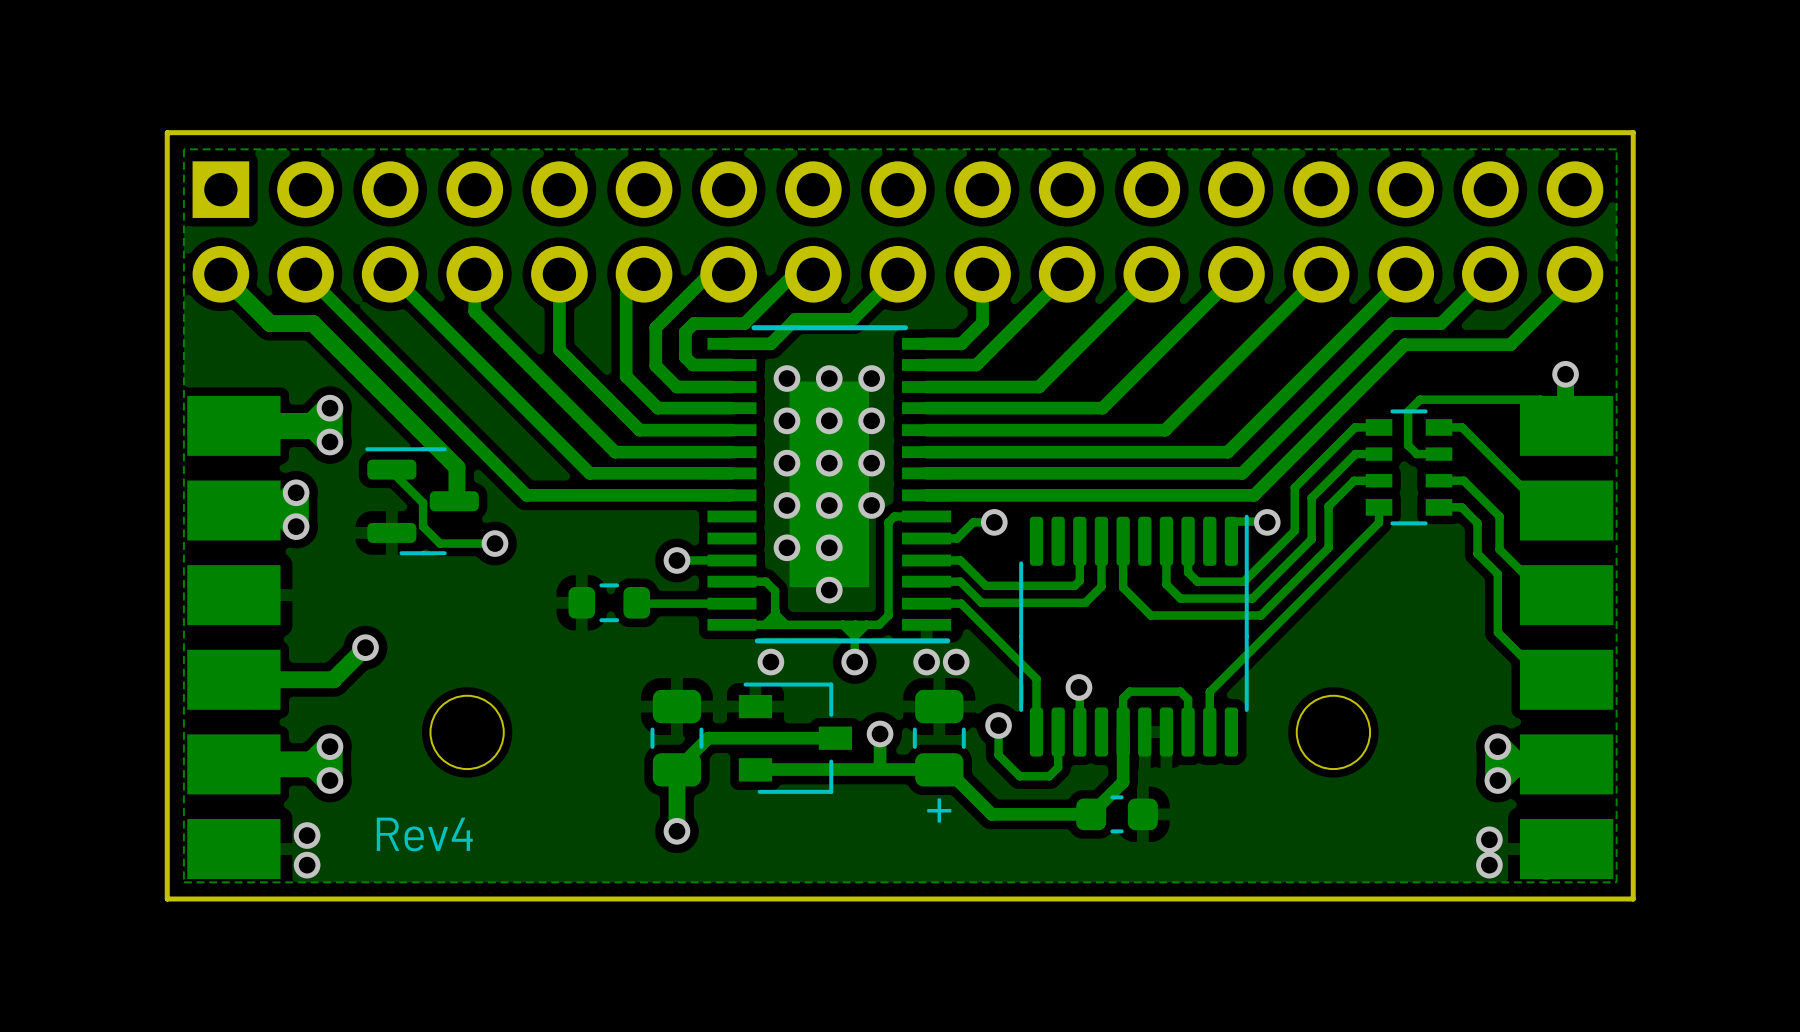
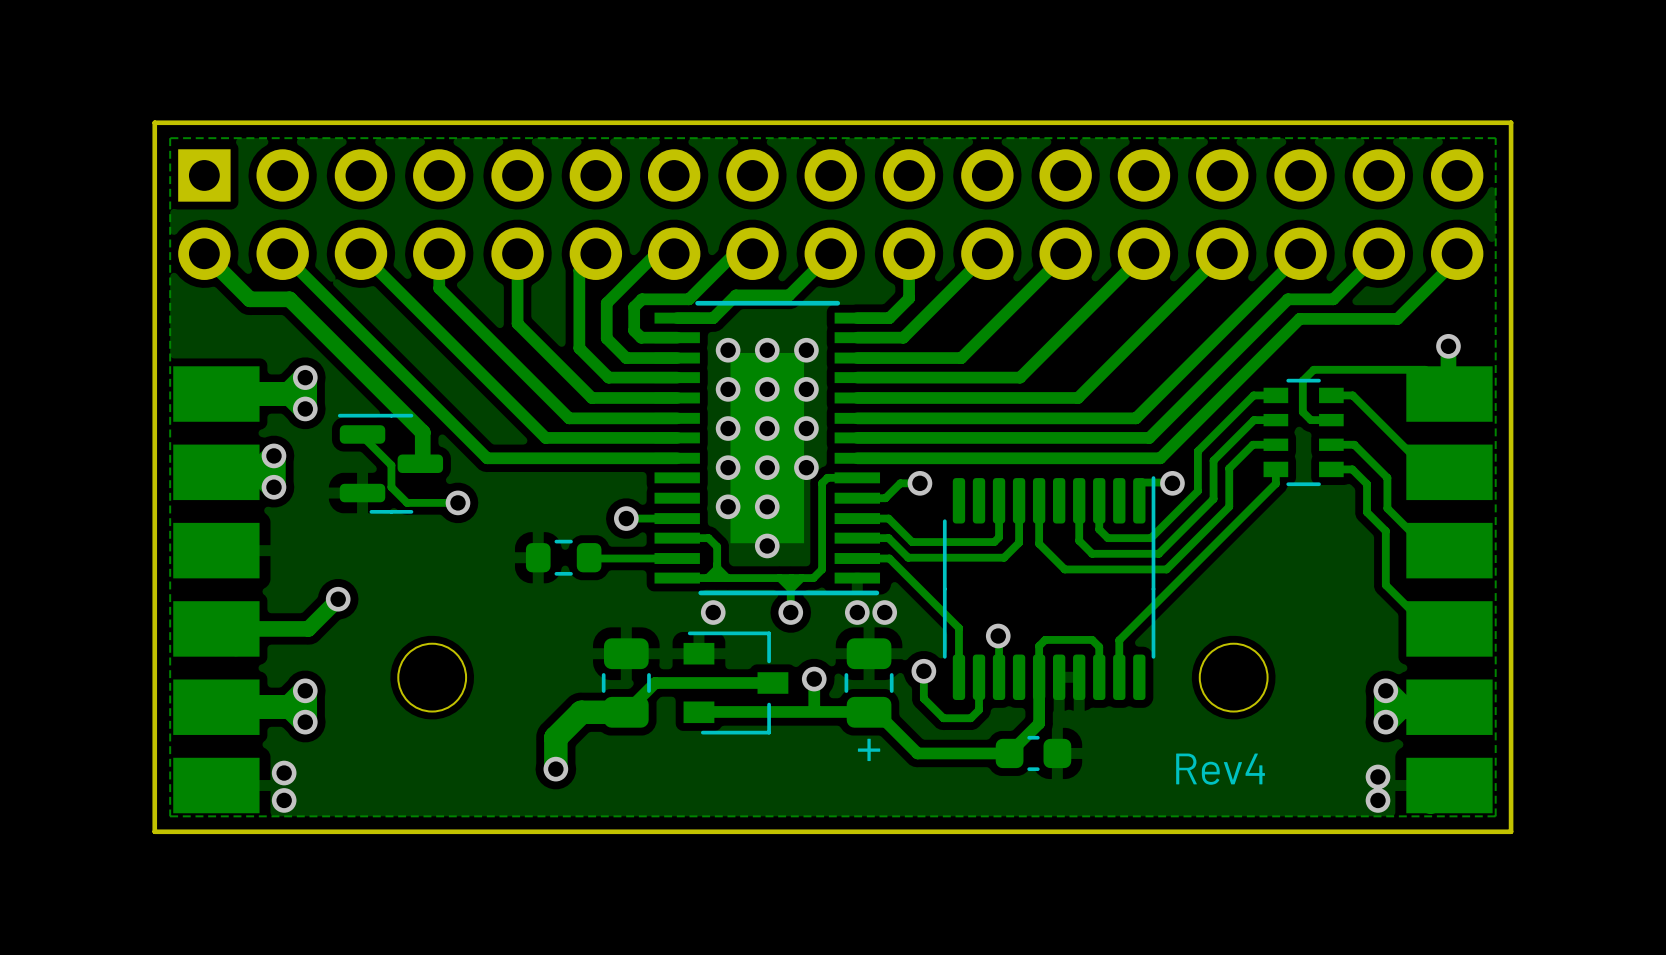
track: (676, 769) (676, 831) -> (626, 712) (581, 712) (555, 737) (555, 769)
via position: (676, 831) -> (555, 769)
text: none -> Rev4 (1220, 769)
text: Rev4 (424, 834) -> none

